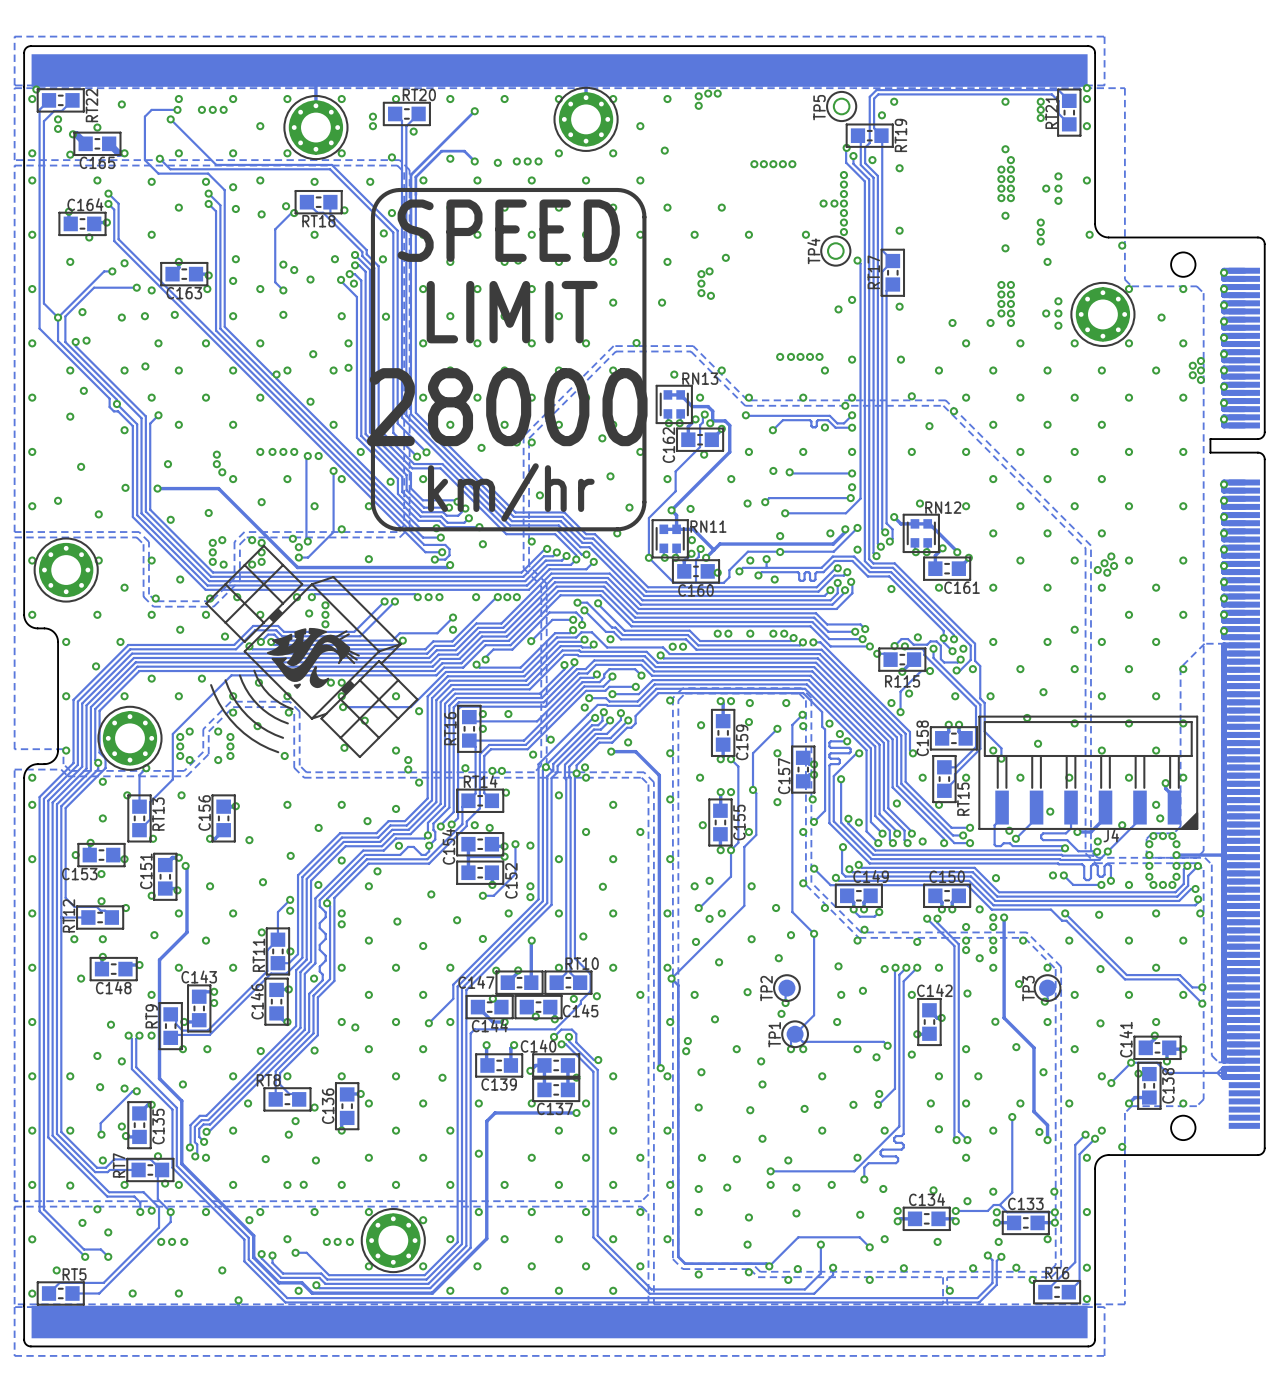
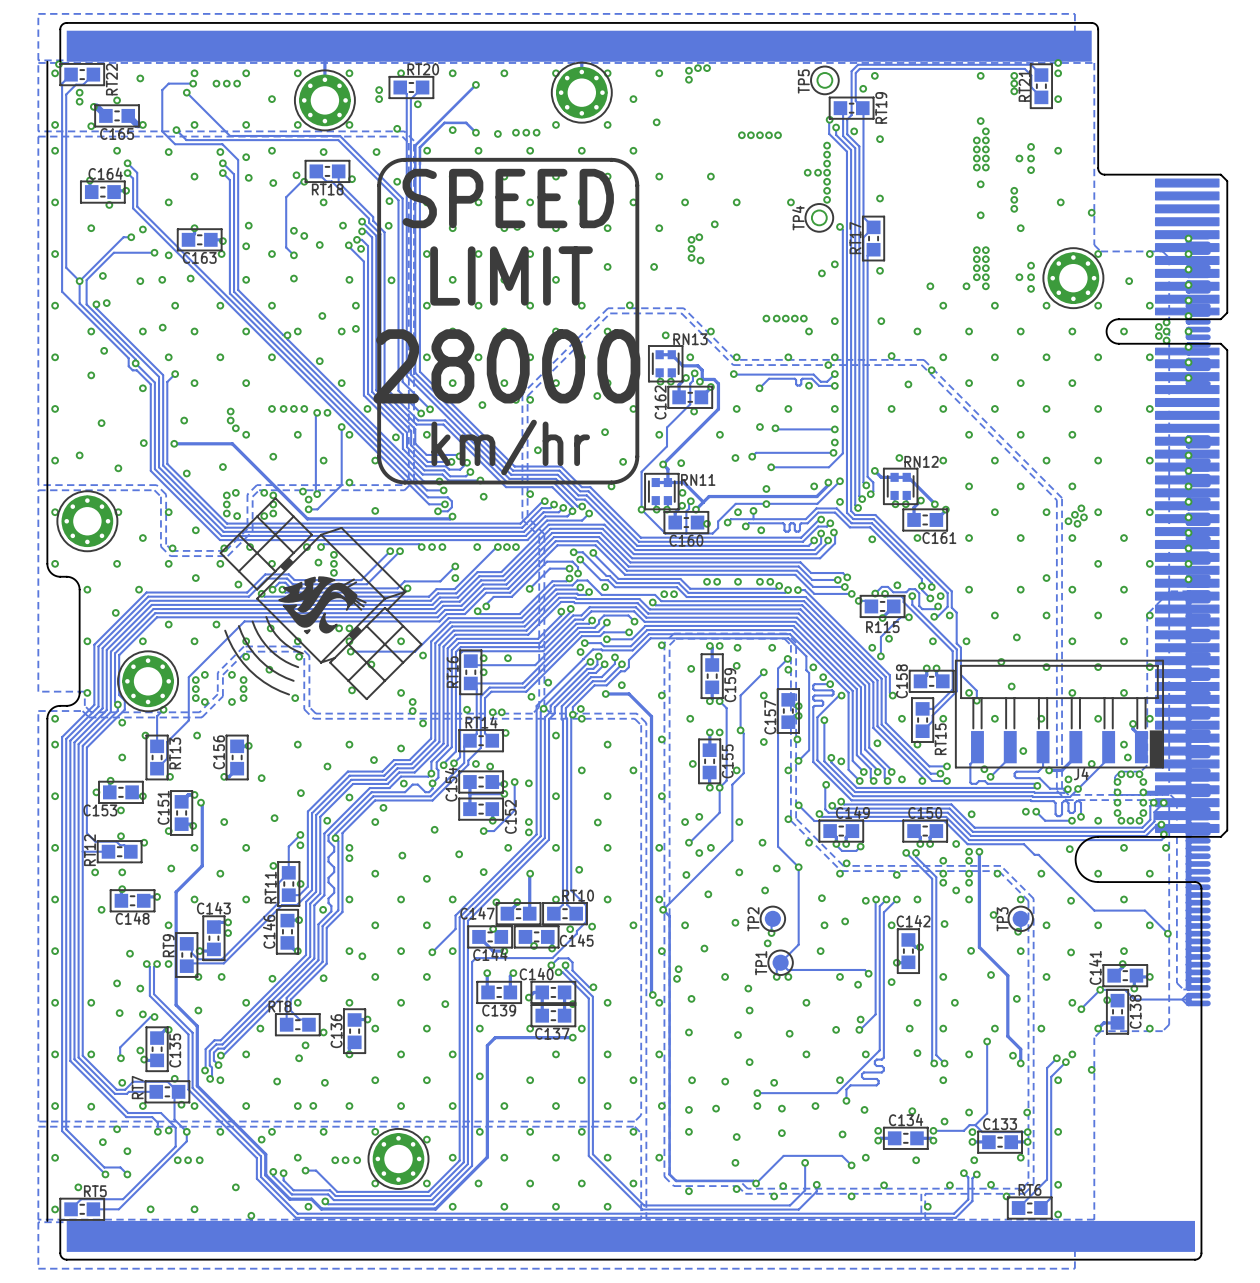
part footprint: [24, 46, 1265, 1347] -> [60, 22, 1228, 1260]
J4 footprint: [978, 715, 1199, 830] -> [954, 659, 1165, 769]
track: (1065, 913) (1126, 975) (1180, 975) (1192, 987) (1202, 987) -> none
via: (1065, 913) -> none
via: (1202, 987) -> none

